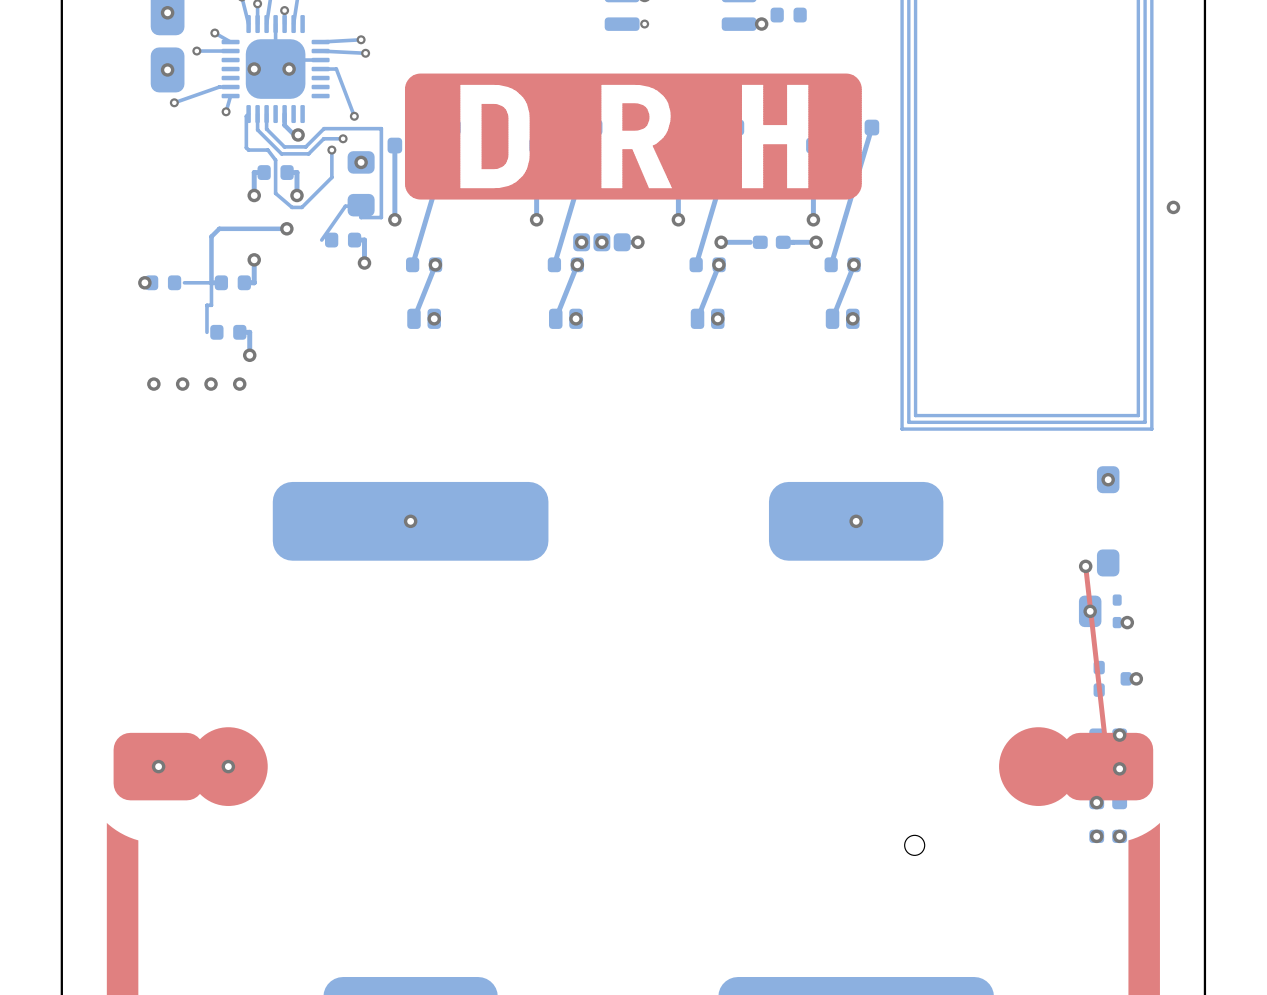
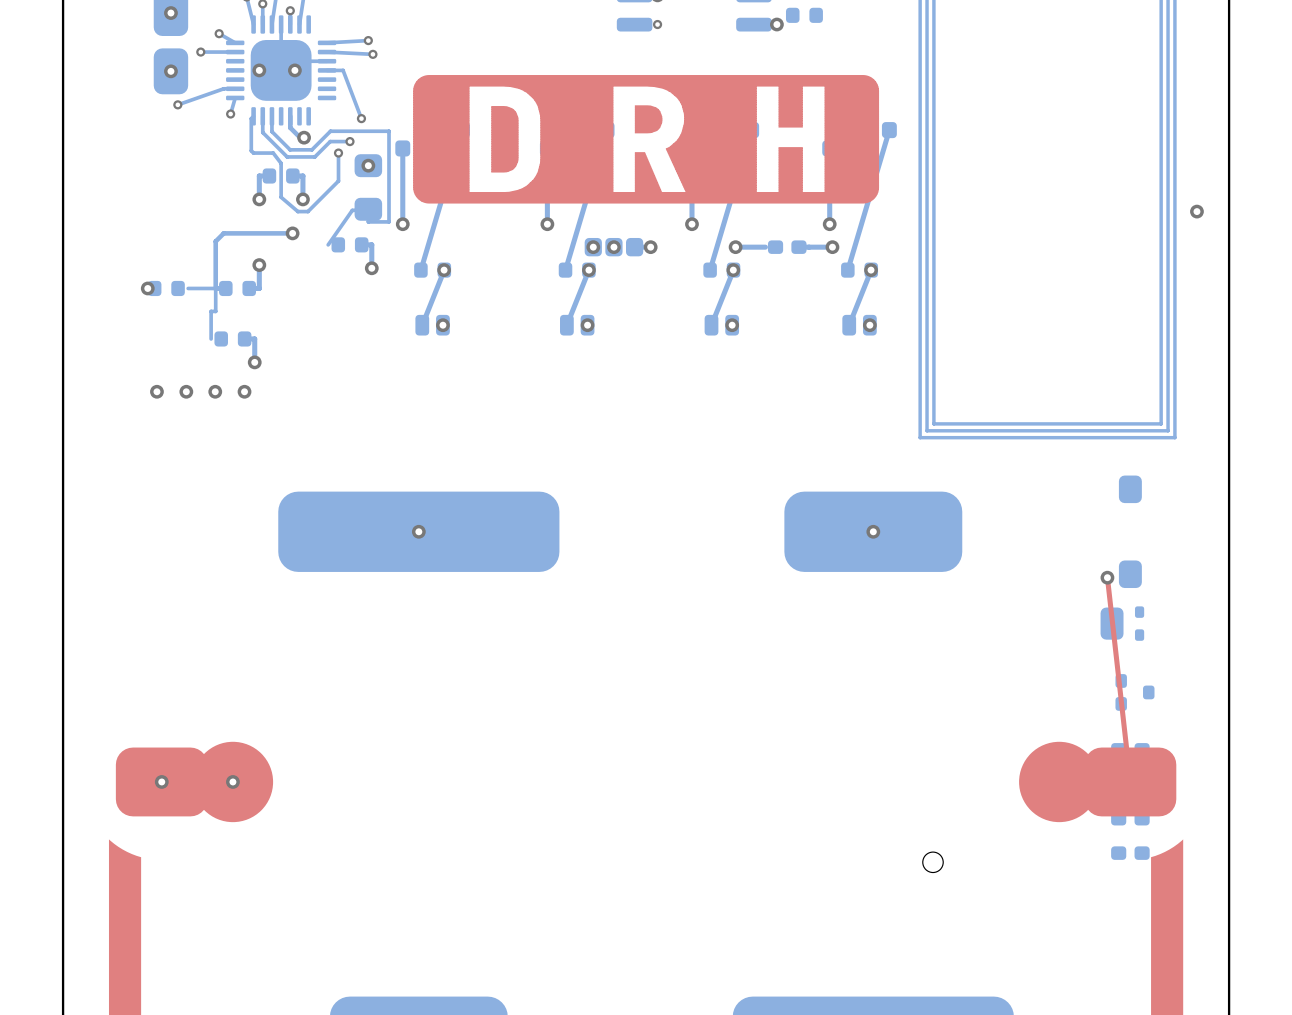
via: (1108, 479) -> none
via: (1090, 611) -> none
via: (1127, 622) -> none
via: (1136, 678) -> none
via: (1119, 735) -> none
via: (1119, 768) -> none
via: (1096, 802) -> none
via: (1096, 836) -> none
via: (1119, 836) -> none

